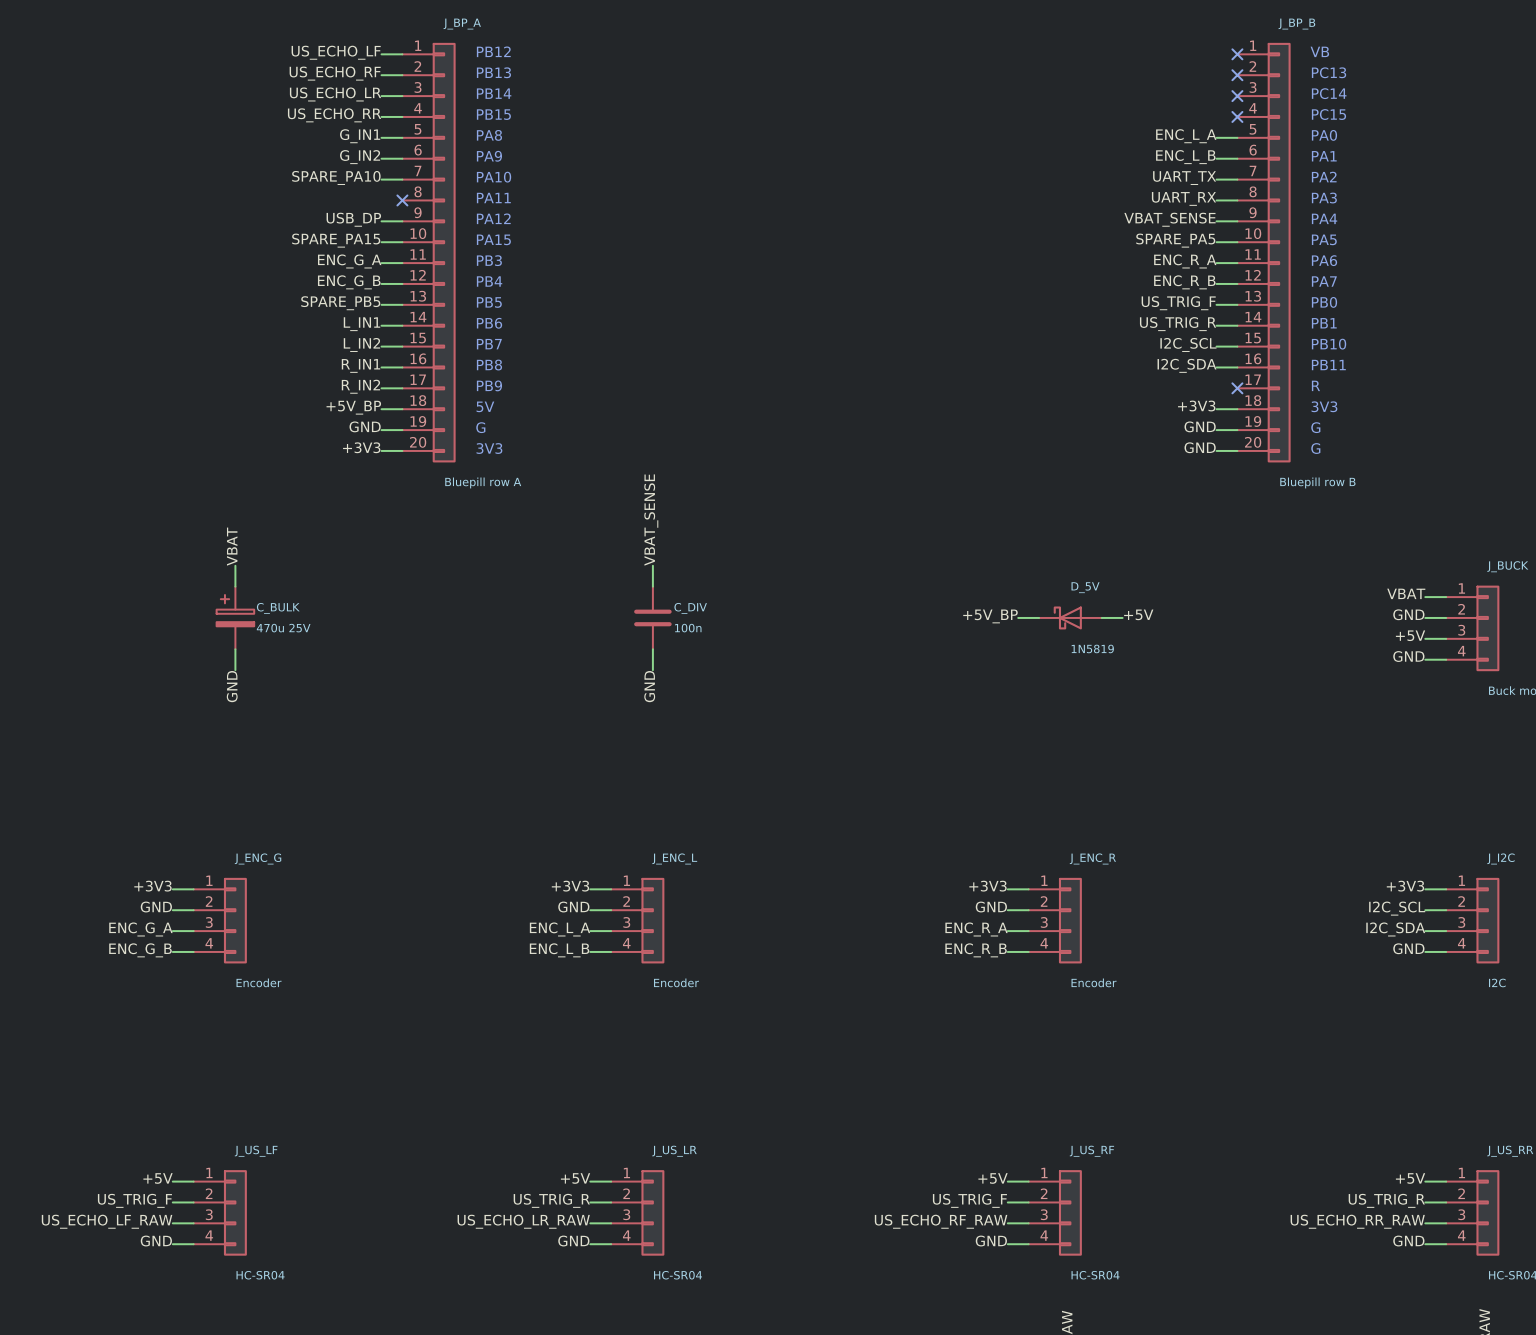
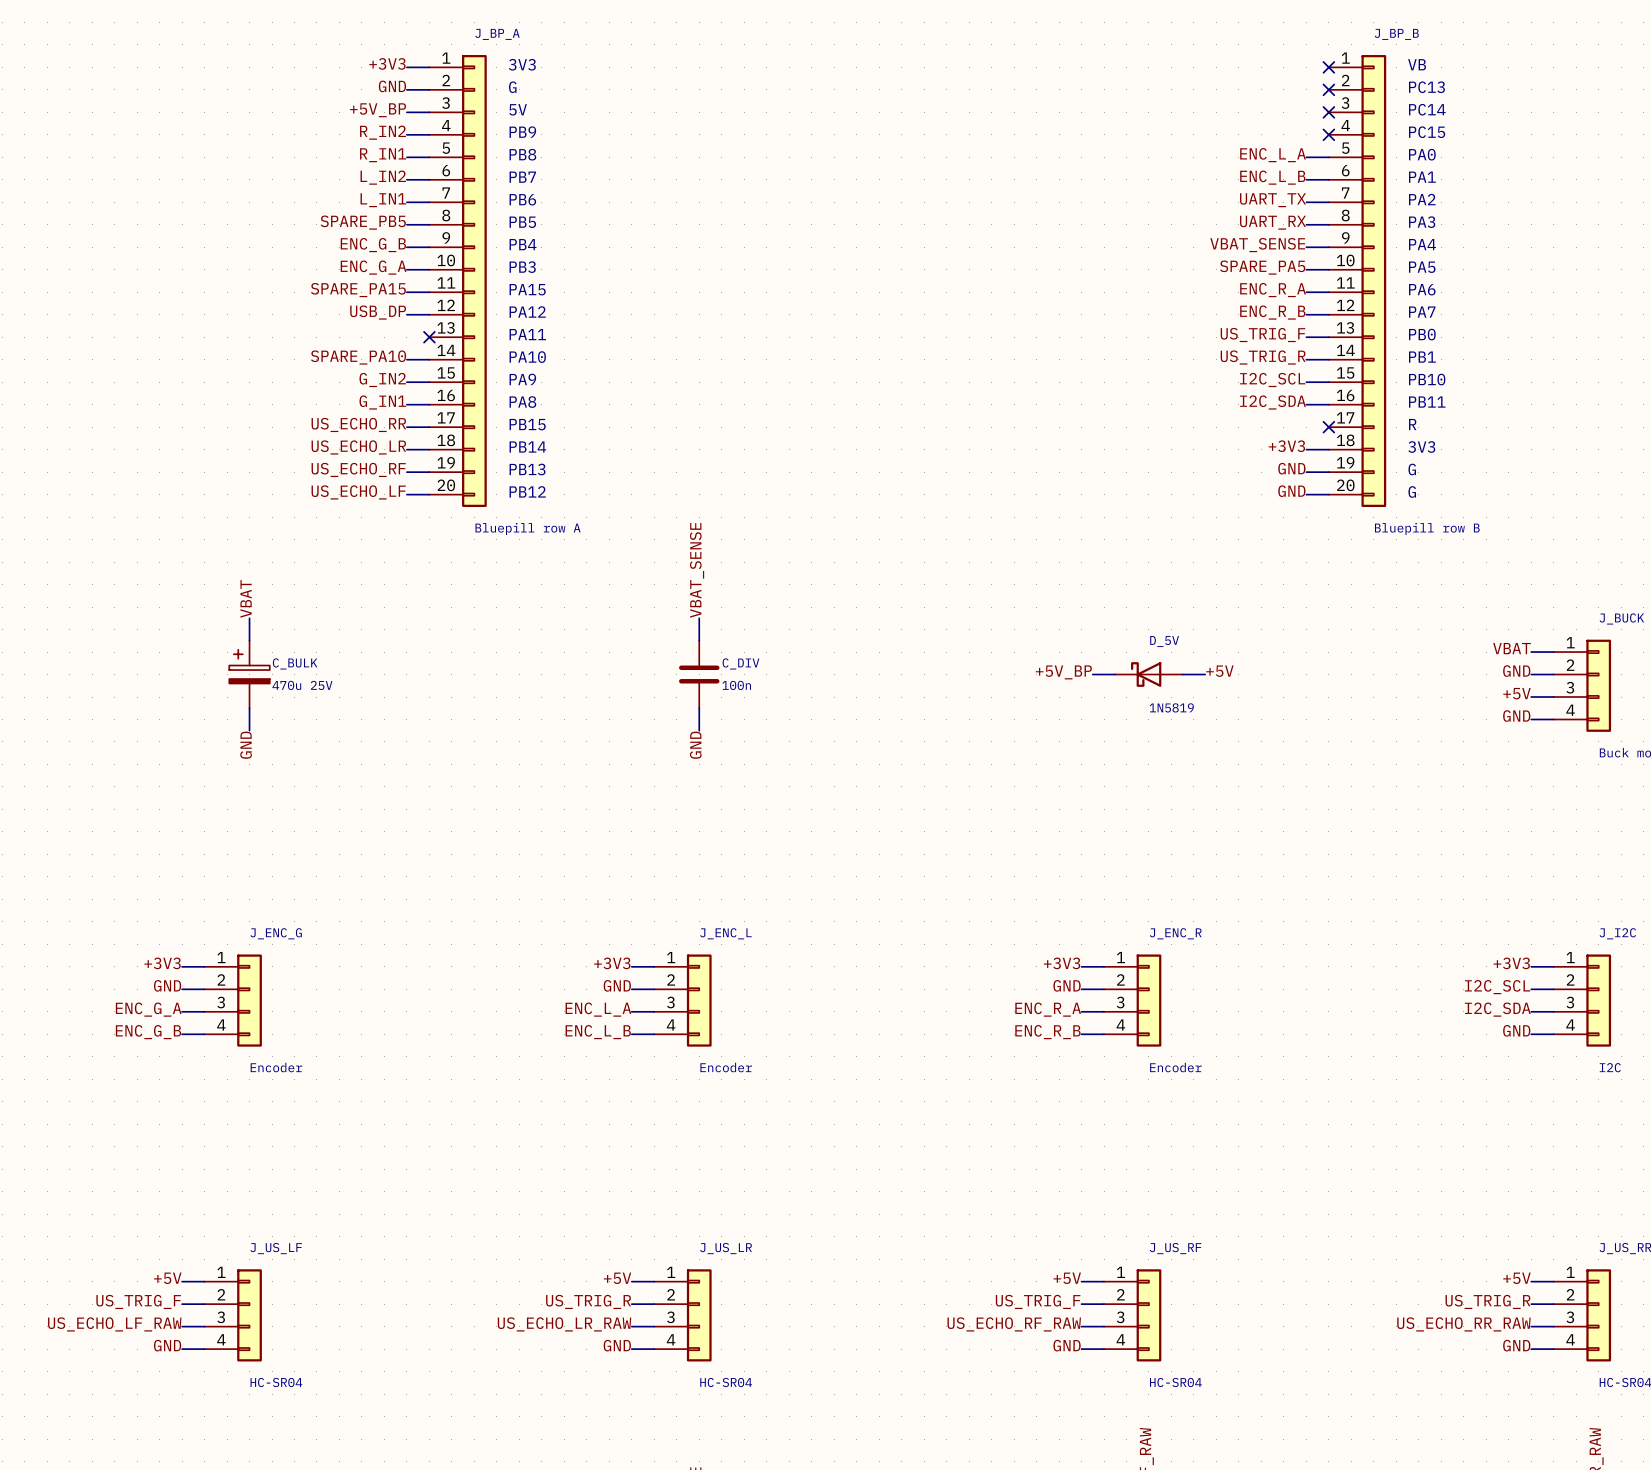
text: PB12 (493, 51) -> 3V3 (522, 64)
label: US_ECHO_LF (336, 52) -> +3V3 (387, 63)
text: PB13 (493, 72) -> G (512, 87)
label: US_ECHO_RF (335, 73) -> GND (392, 86)
text: PB14 (494, 93) -> 5V (518, 109)
label: US_ECHO_LR (335, 94) -> +5V_BP (377, 110)
text: PB15 (493, 114) -> PB9 (522, 132)
label: US_ECHO_RR (334, 115) -> R_IN2 (382, 132)
text: PA8 (489, 135) -> PB8 (522, 154)
label: G_IN1 (360, 136) -> R_IN1 (383, 155)
text: PA9 (489, 156) -> PB7 (522, 177)
label: G_IN2 (360, 157) -> L_IN2 (383, 177)
label: SPARE_PA10 (336, 177) -> L_IN1 (383, 200)
text: PA10 (494, 177) -> PB6 (522, 199)
text: PA11 (493, 198) -> PB5 (522, 222)
no-connect mark: (402, 200) -> none
text: PA12 (493, 218) -> PB4 (523, 244)
label: USB_DP (353, 219) -> ENC_G_B (373, 245)
text: PA15 (493, 239) -> PB3 (522, 267)
label: SPARE_PA15 (336, 240) -> ENC_G_A (373, 267)
text: PB3 (489, 260) -> PA15 (527, 289)
label: ENC_G_A (349, 261) -> SPARE_PA15 (358, 290)
text: PB4 (489, 281) -> PA12 (527, 312)
label: ENC_G_B (349, 282) -> USB_DP (378, 312)
text: PB5 (489, 302) -> PA11 (527, 334)
label position: SPARE_PB5 (340, 303) -> SPARE_PB5 (363, 222)
wire: (381, 304) (402, 304) -> (406, 224) (429, 224)
no-connect mark: none -> (429, 337)
text: PB6 (489, 323) -> PA10 (527, 357)
label: L_IN1 (361, 324) -> SPARE_PA10 (358, 357)
label: L_IN2 (361, 344) -> G_IN2 (382, 380)
text: PB7 (489, 344) -> PA9 (522, 379)
label: R_IN1 (361, 365) -> G_IN1 (382, 402)
text: PB8 (489, 365) -> PA8 (522, 402)
text: PB9 (489, 385) -> PB15 (527, 424)
label: R_IN2 (360, 386) -> US_ECHO_RR (358, 424)
text: 5V (485, 406) -> PB14 (527, 447)
label: +5V_BP (353, 407) -> US_ECHO_LR (358, 447)
label: GND (365, 426) -> US_ECHO_RF (358, 469)
text: G (480, 427) -> PB13 (527, 469)
label: +3V3 (361, 447) -> US_ECHO_LF (358, 492)
text: 3V3 (489, 448) -> PB12 (527, 491)

